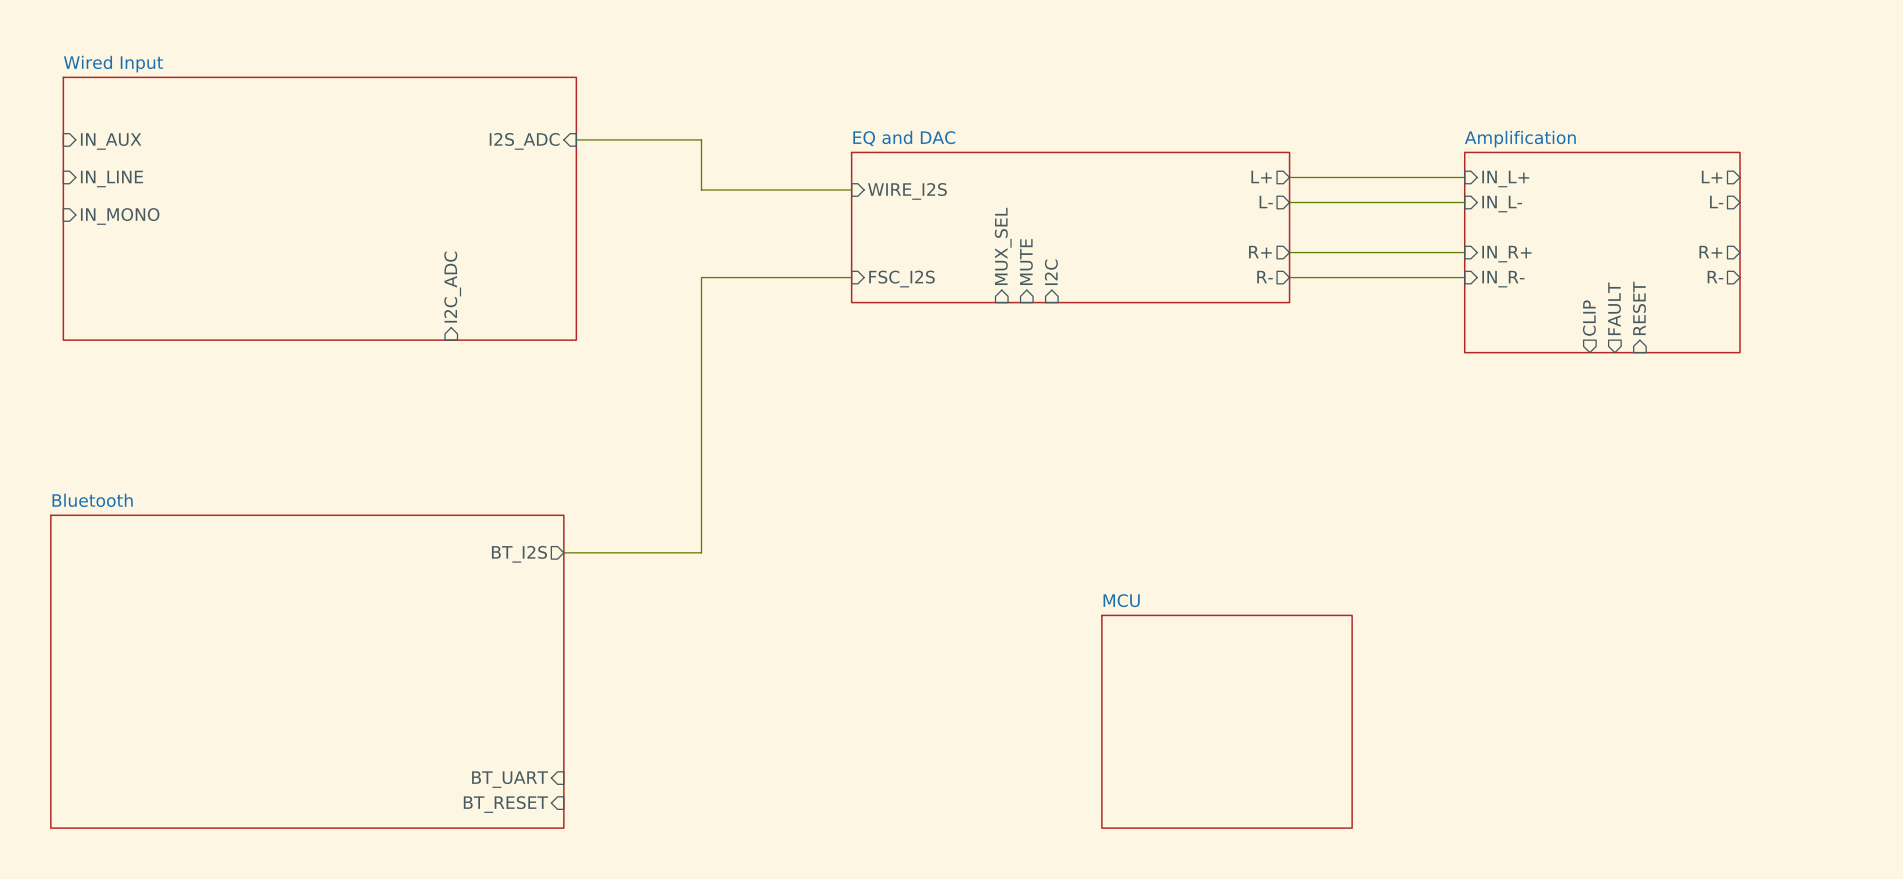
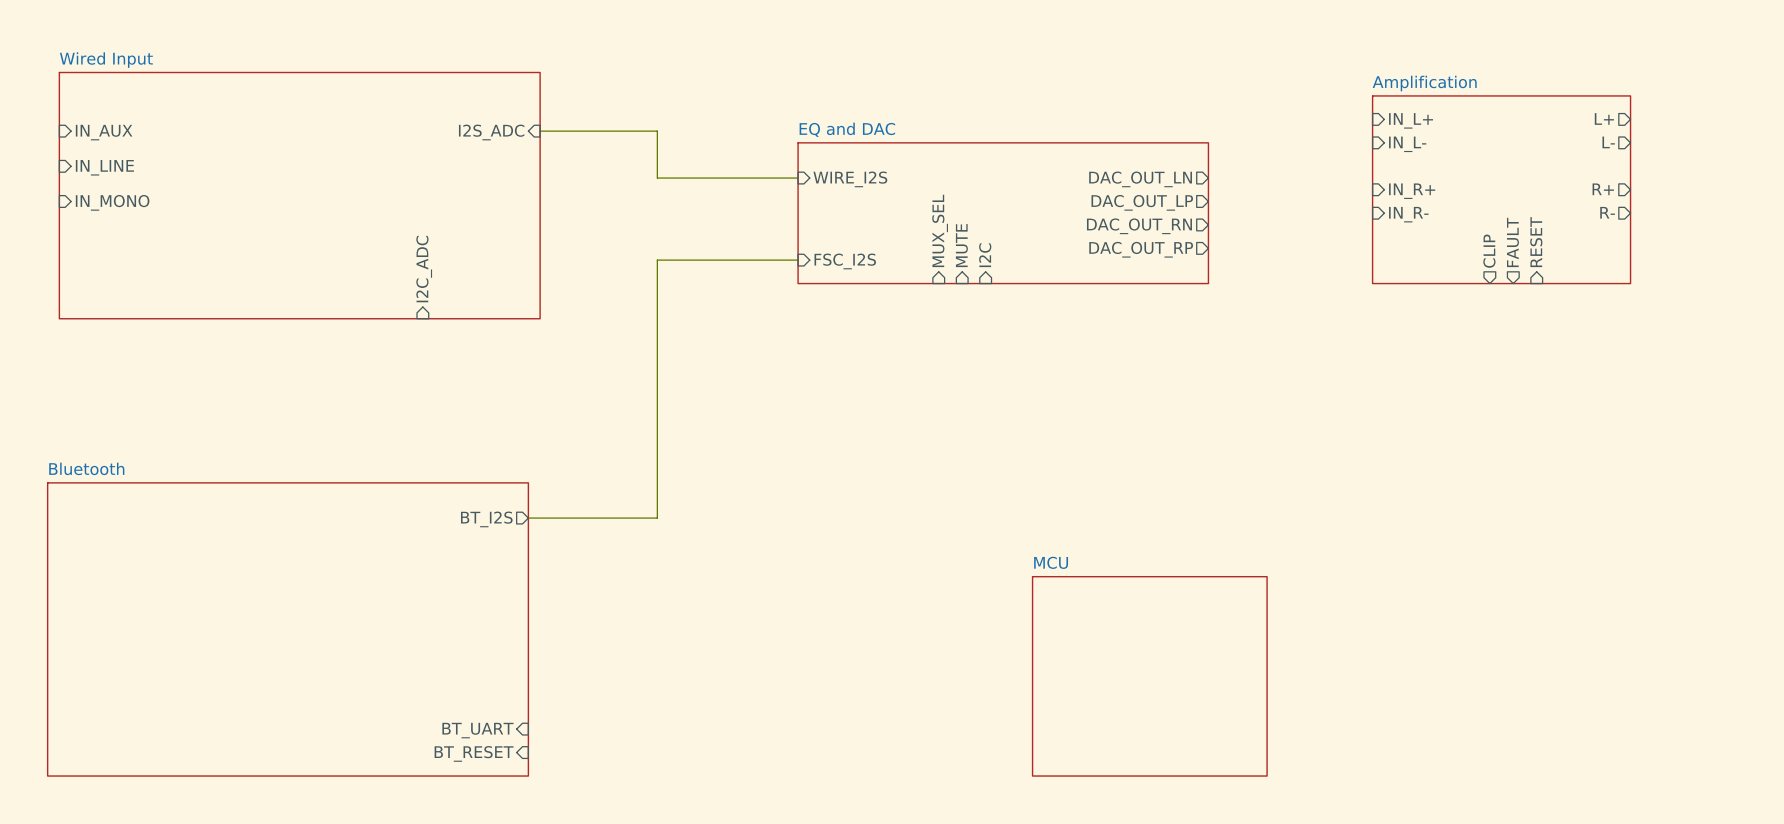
sheet pin: none -> L- (1608, 142)
sheet pin: none -> IN_L- (1407, 144)
sheet pin: L+ (1261, 177) -> none
wire: (1289, 177) (1464, 177) -> none
sheet pin position: L+ (1712, 177) -> L+ (1604, 118)
sheet pin position: IN_L+ (1505, 179) -> IN_L+ (1411, 120)
sheet pin: none -> DAC_OUT_LN (1140, 179)
sheet pin: L- (1266, 202) -> none
wire: (1289, 202) (1464, 202) -> none
sheet pin: L- (1716, 202) -> R+ (1603, 189)
sheet pin: IN_L- (1502, 204) -> IN_R+ (1412, 191)
sheet pin: none -> DAC_OUT_LP (1142, 202)
sheet pin: none -> DAC_OUT_RN (1139, 226)
sheet pin: R+ (1260, 252) -> none
wire: (1289, 252) (1464, 252) -> none
sheet Amplification position: (1602, 252) -> (1501, 189)
sheet pin: R+ (1710, 252) -> none
sheet pin: IN_R+ (1506, 254) -> none
sheet pin: none -> DAC_OUT_RP (1141, 249)
sheet pin: R- (1265, 277) -> none
wire: (1289, 277) (1464, 277) -> none
sheet pin position: R- (1715, 277) -> R- (1607, 212)
sheet pin position: IN_R- (1503, 279) -> IN_R- (1408, 214)
sheet pin position: FAULT (1614, 308) -> FAULT (1512, 242)
sheet pin position: RESET (1639, 308) -> RESET (1536, 242)
sheet pin position: CLIP (1589, 318) -> CLIP (1489, 251)

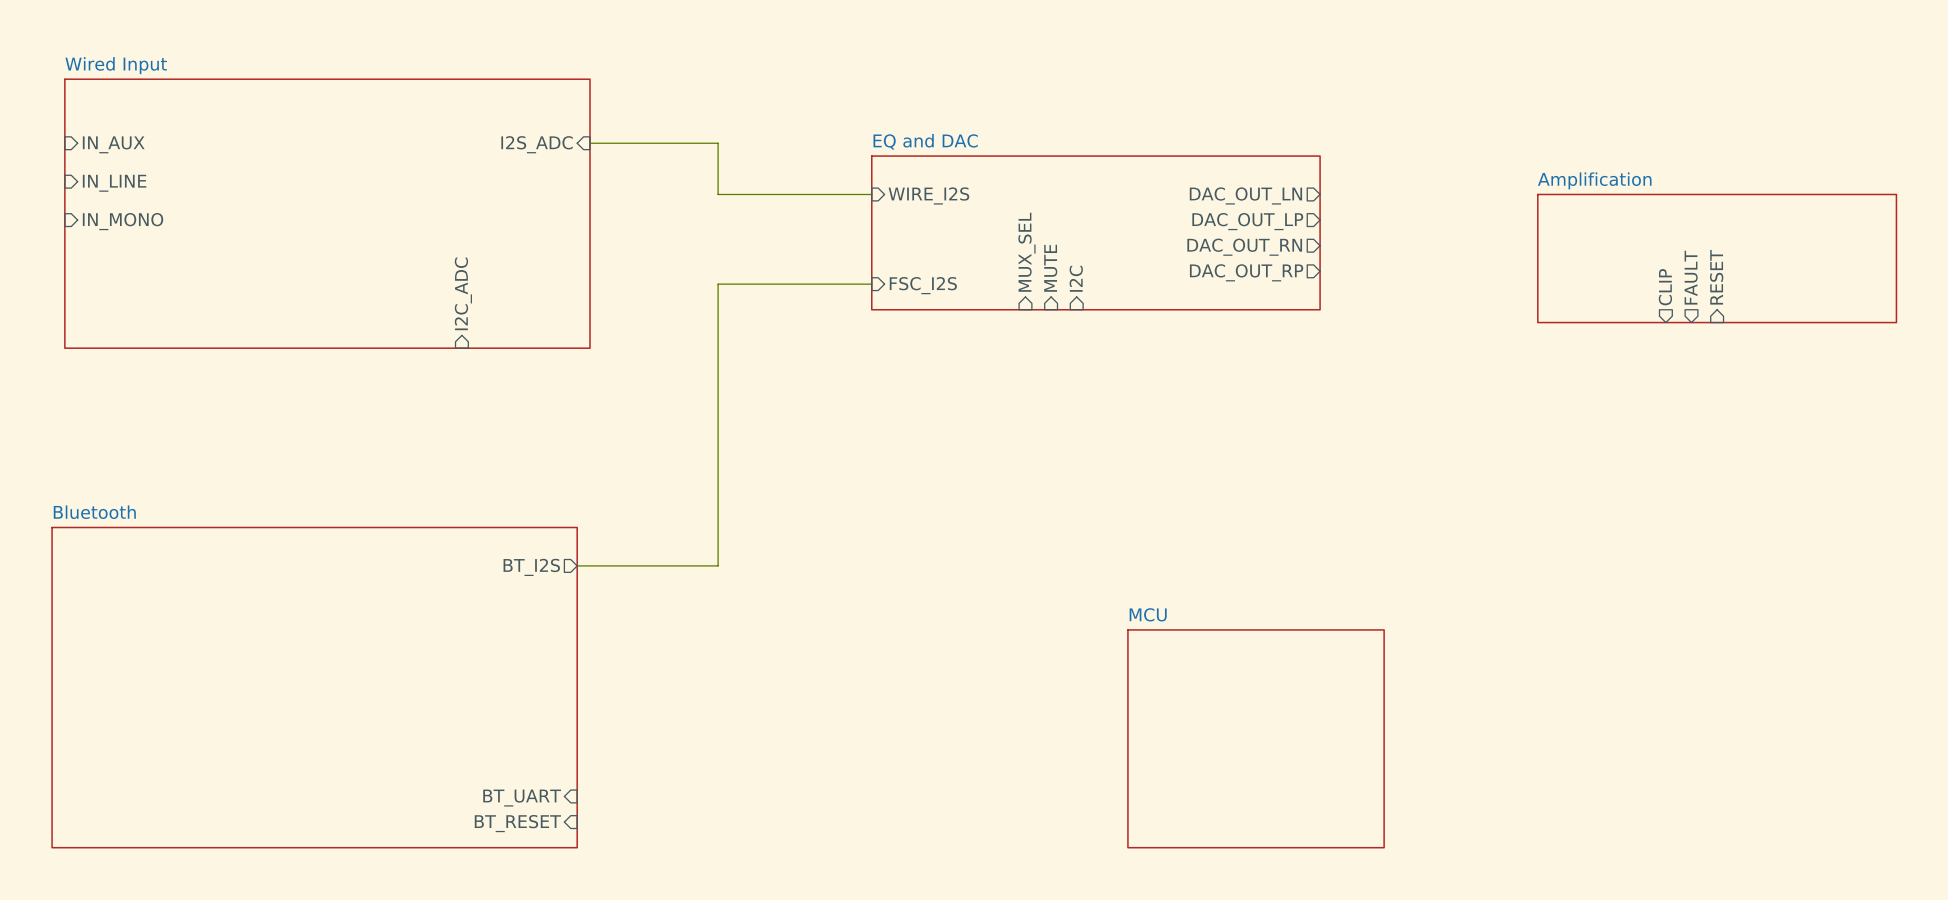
sheet pin: L+ (1604, 118) -> none
sheet pin: IN_L+ (1411, 120) -> none
sheet pin: L- (1608, 142) -> none
sheet pin: IN_L- (1407, 144) -> none
sheet Amplification: (1501, 189) -> none
sheet pin: R+ (1603, 189) -> none
sheet pin: IN_R+ (1412, 191) -> none
sheet pin: R- (1607, 212) -> none
sheet pin: IN_R- (1408, 214) -> none
sheet Amplification: none -> (1717, 258)
sheet pin position: FAULT (1512, 242) -> FAULT (1691, 277)
sheet pin position: RESET (1536, 242) -> RESET (1716, 277)
sheet pin position: CLIP (1489, 251) -> CLIP (1665, 287)

